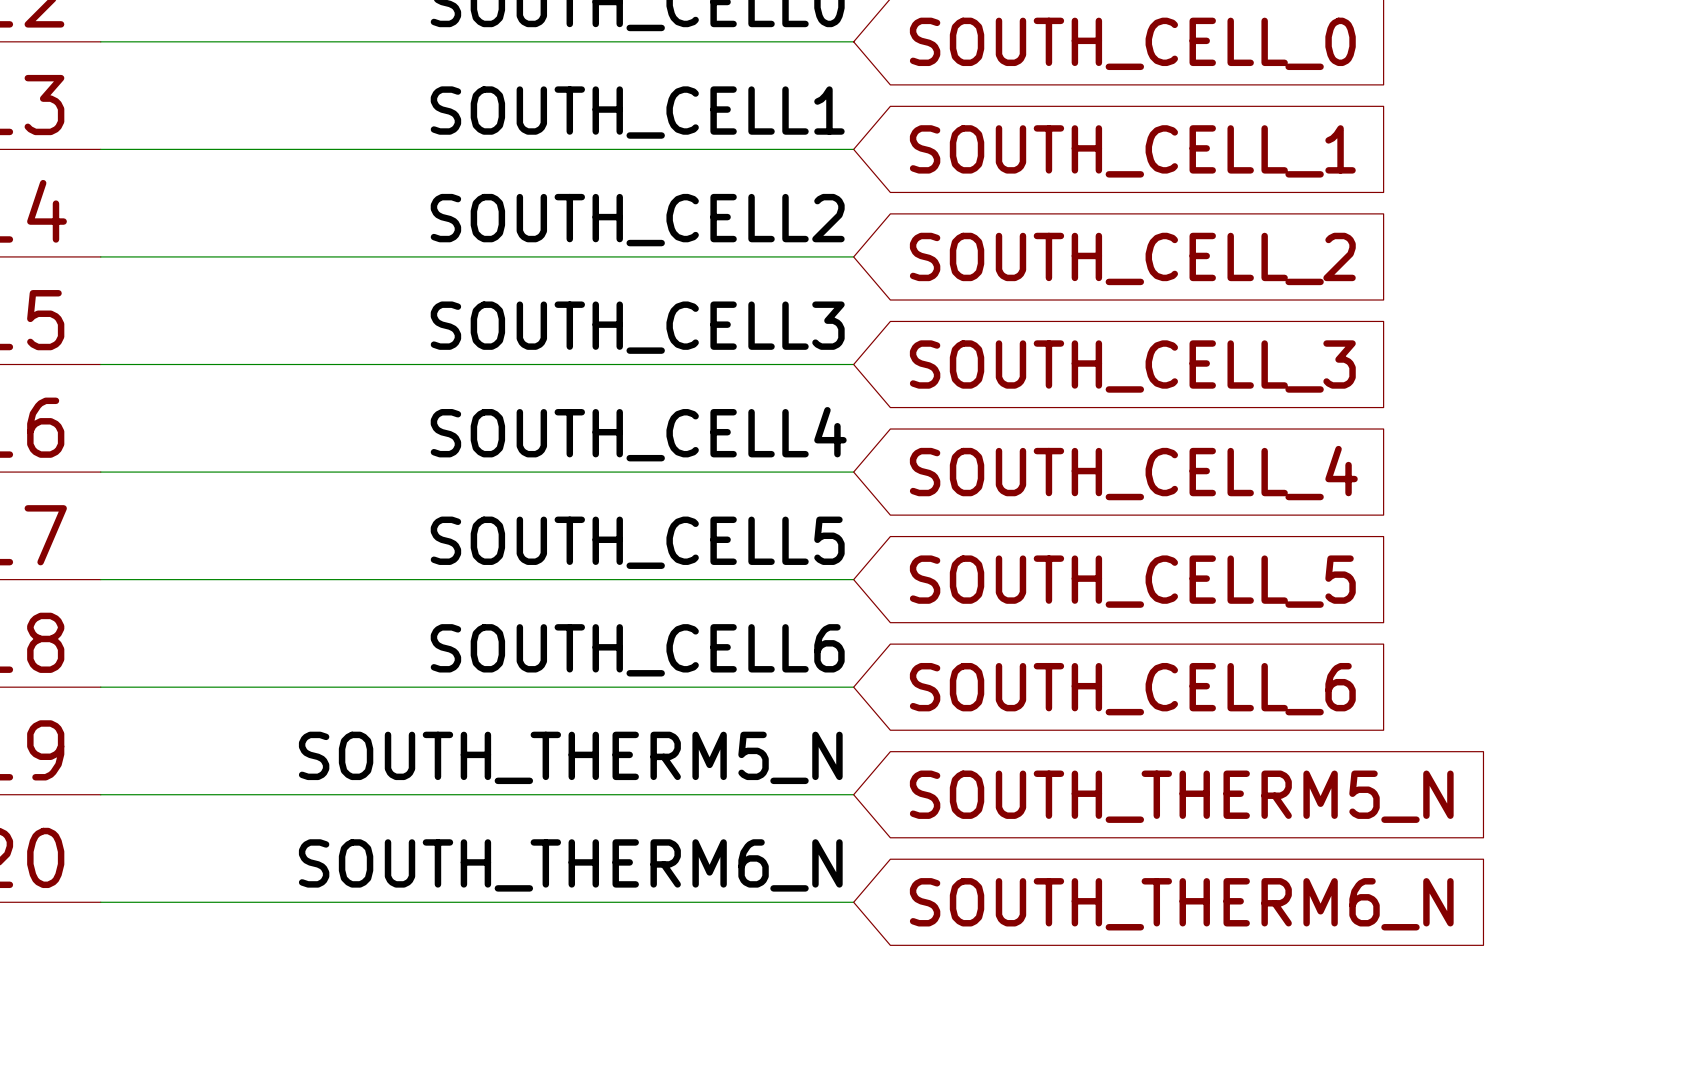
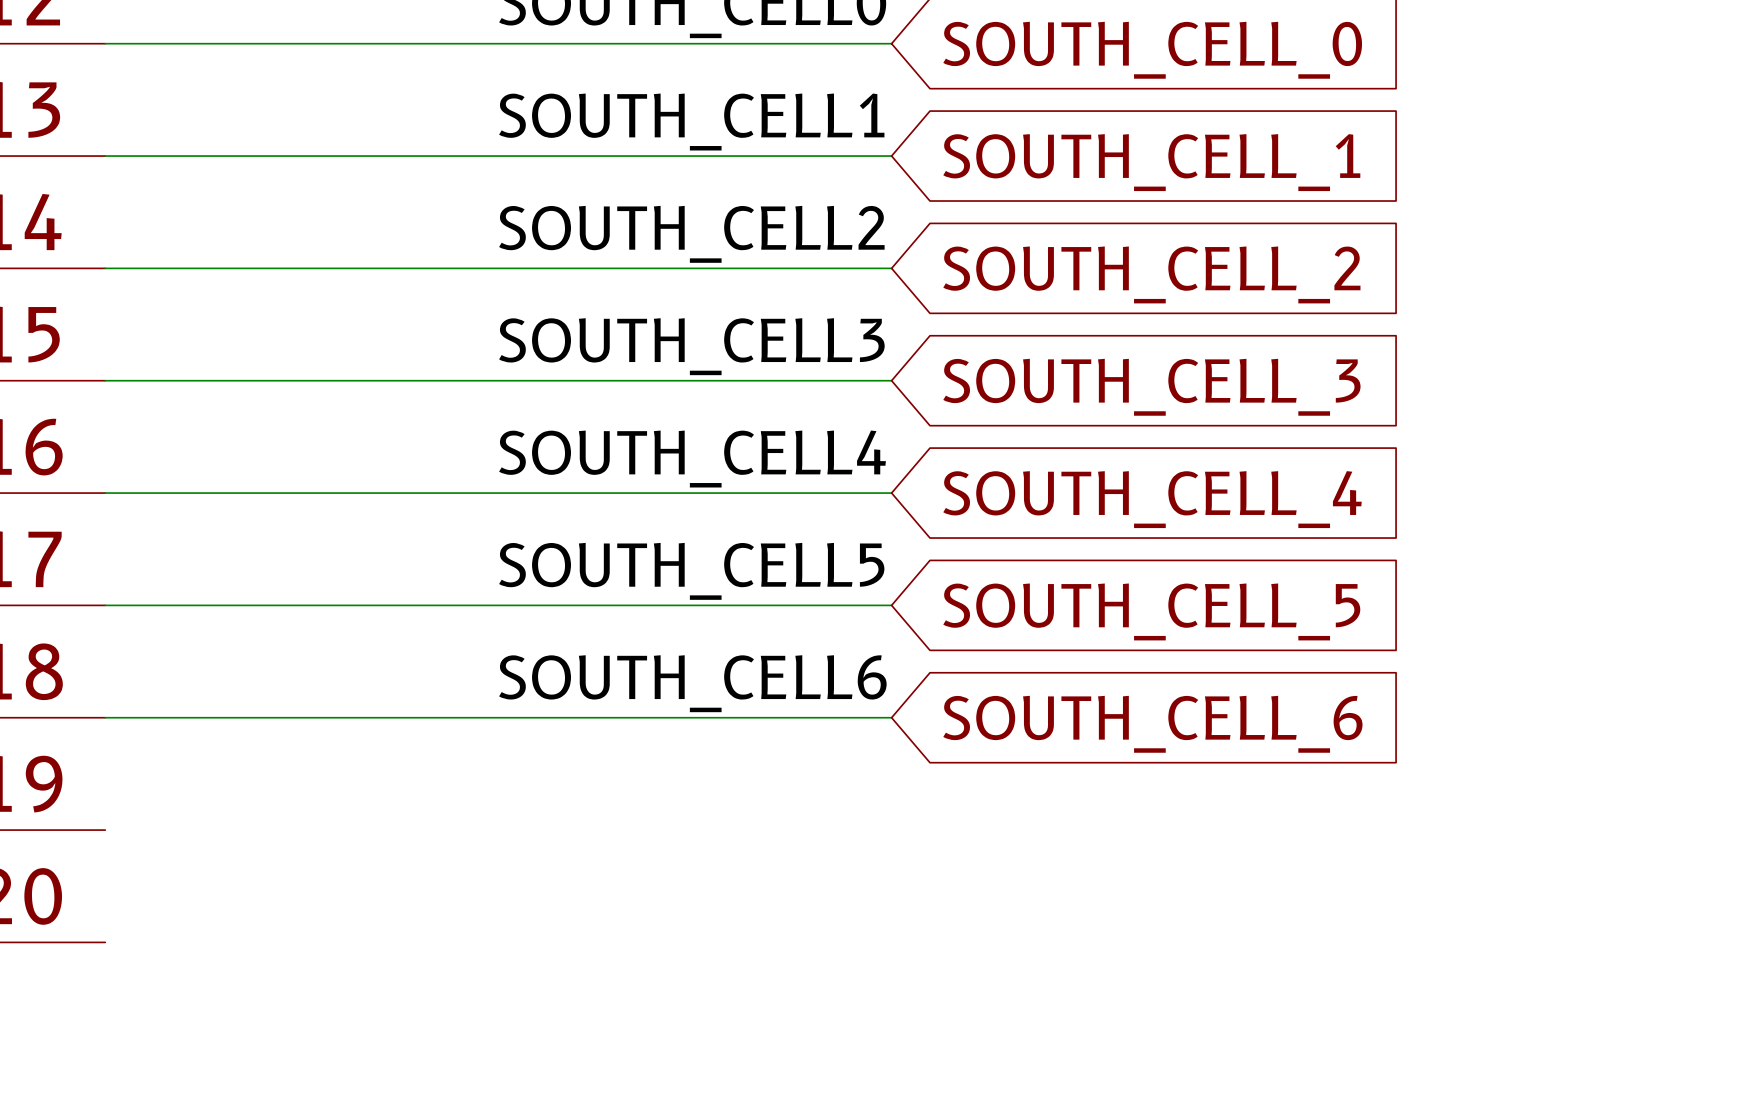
label: SOUTH_THERM5_N (570, 757) -> none
wire: (100, 794) (853, 794) -> none
global label: SOUTH_THERM5_N (1181, 796) -> none
label: SOUTH_THERM6_N (570, 865) -> none
wire: (100, 902) (853, 902) -> none
global label: SOUTH_THERM6_N (1181, 904) -> none

